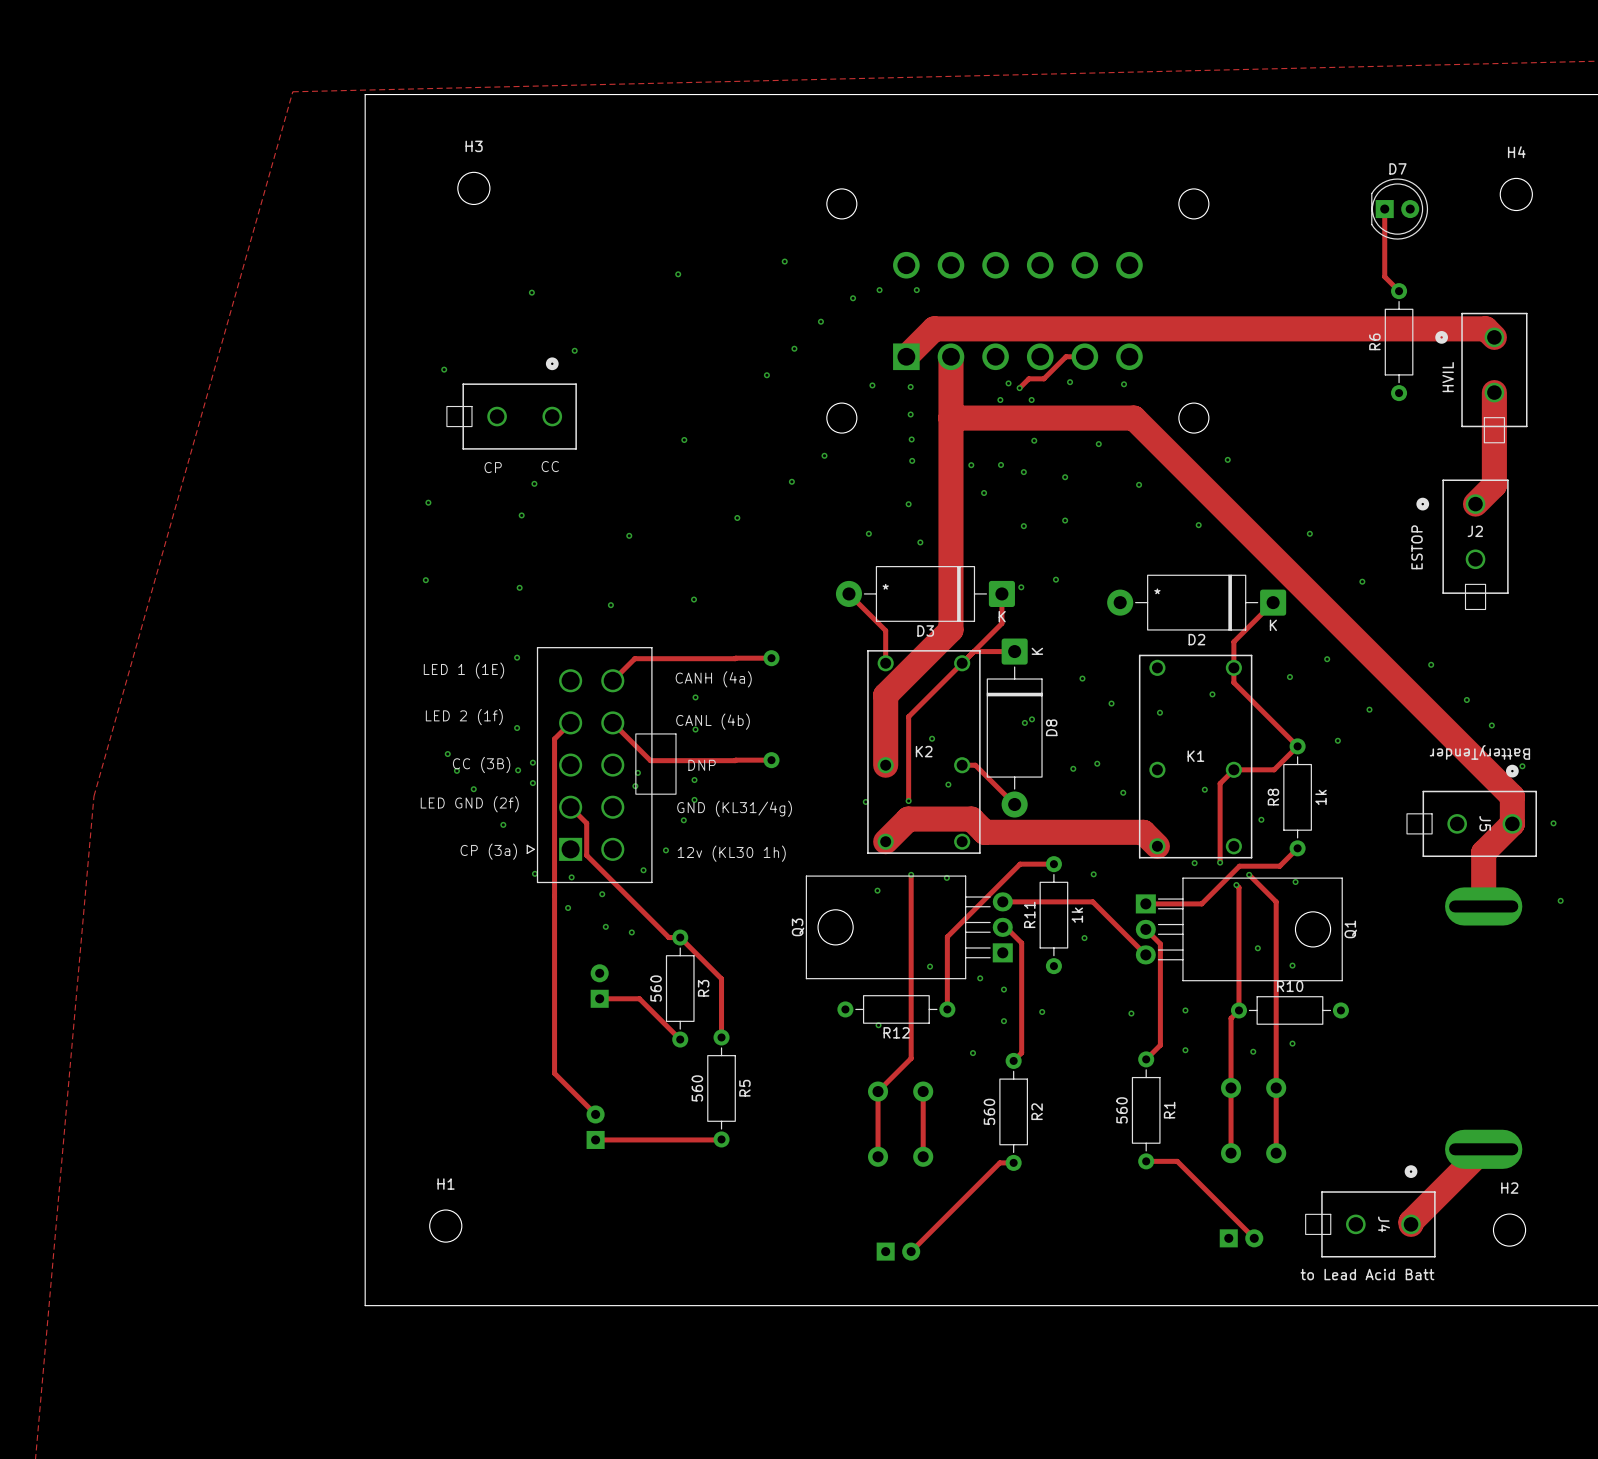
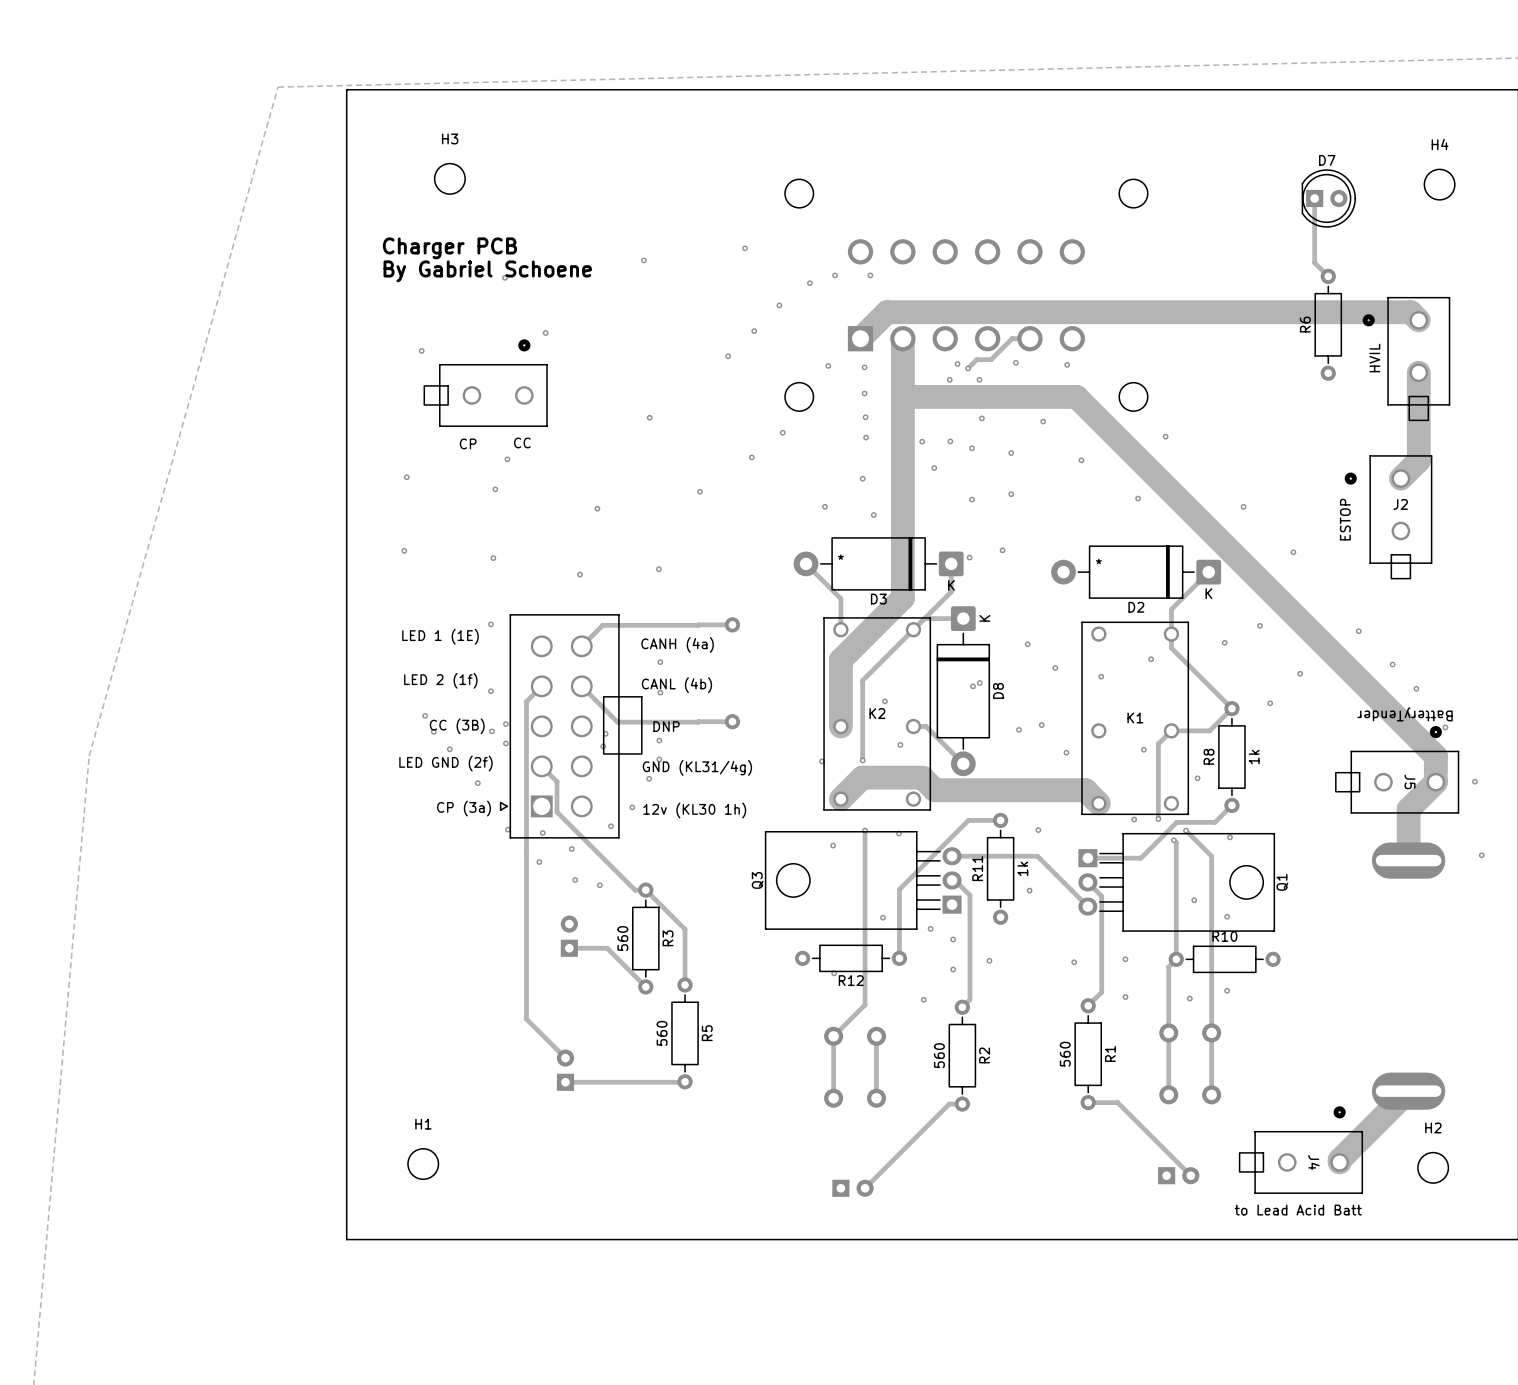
text: none -> Charger PCB (449, 248)
text: none -> By Gabriel Schoene (487, 271)

